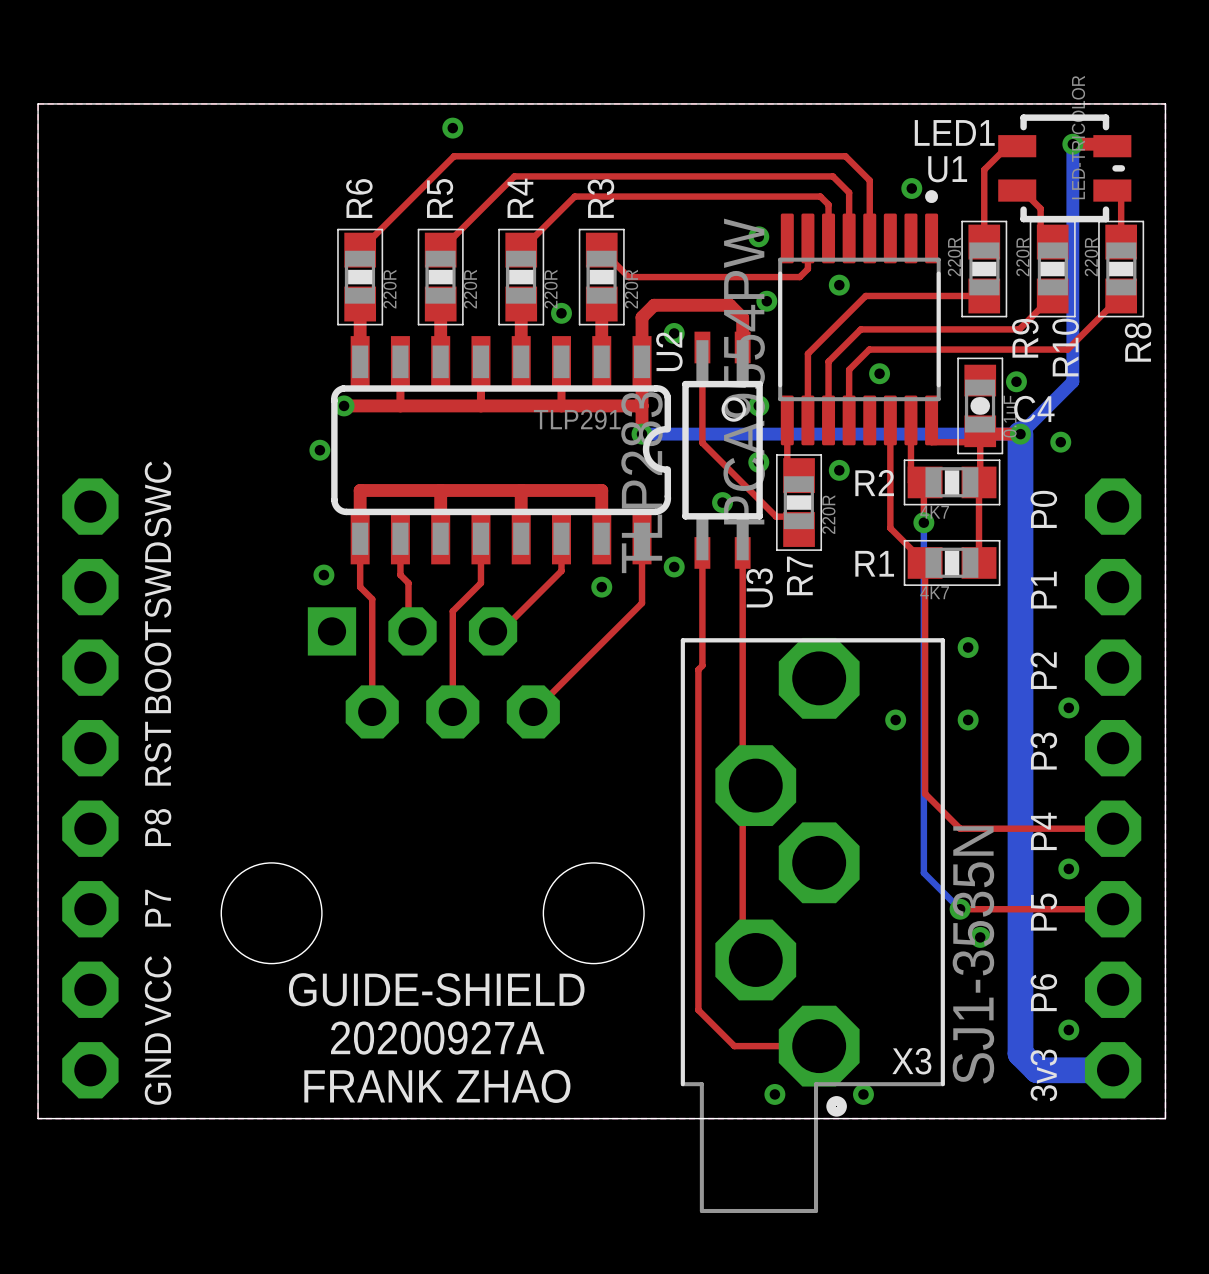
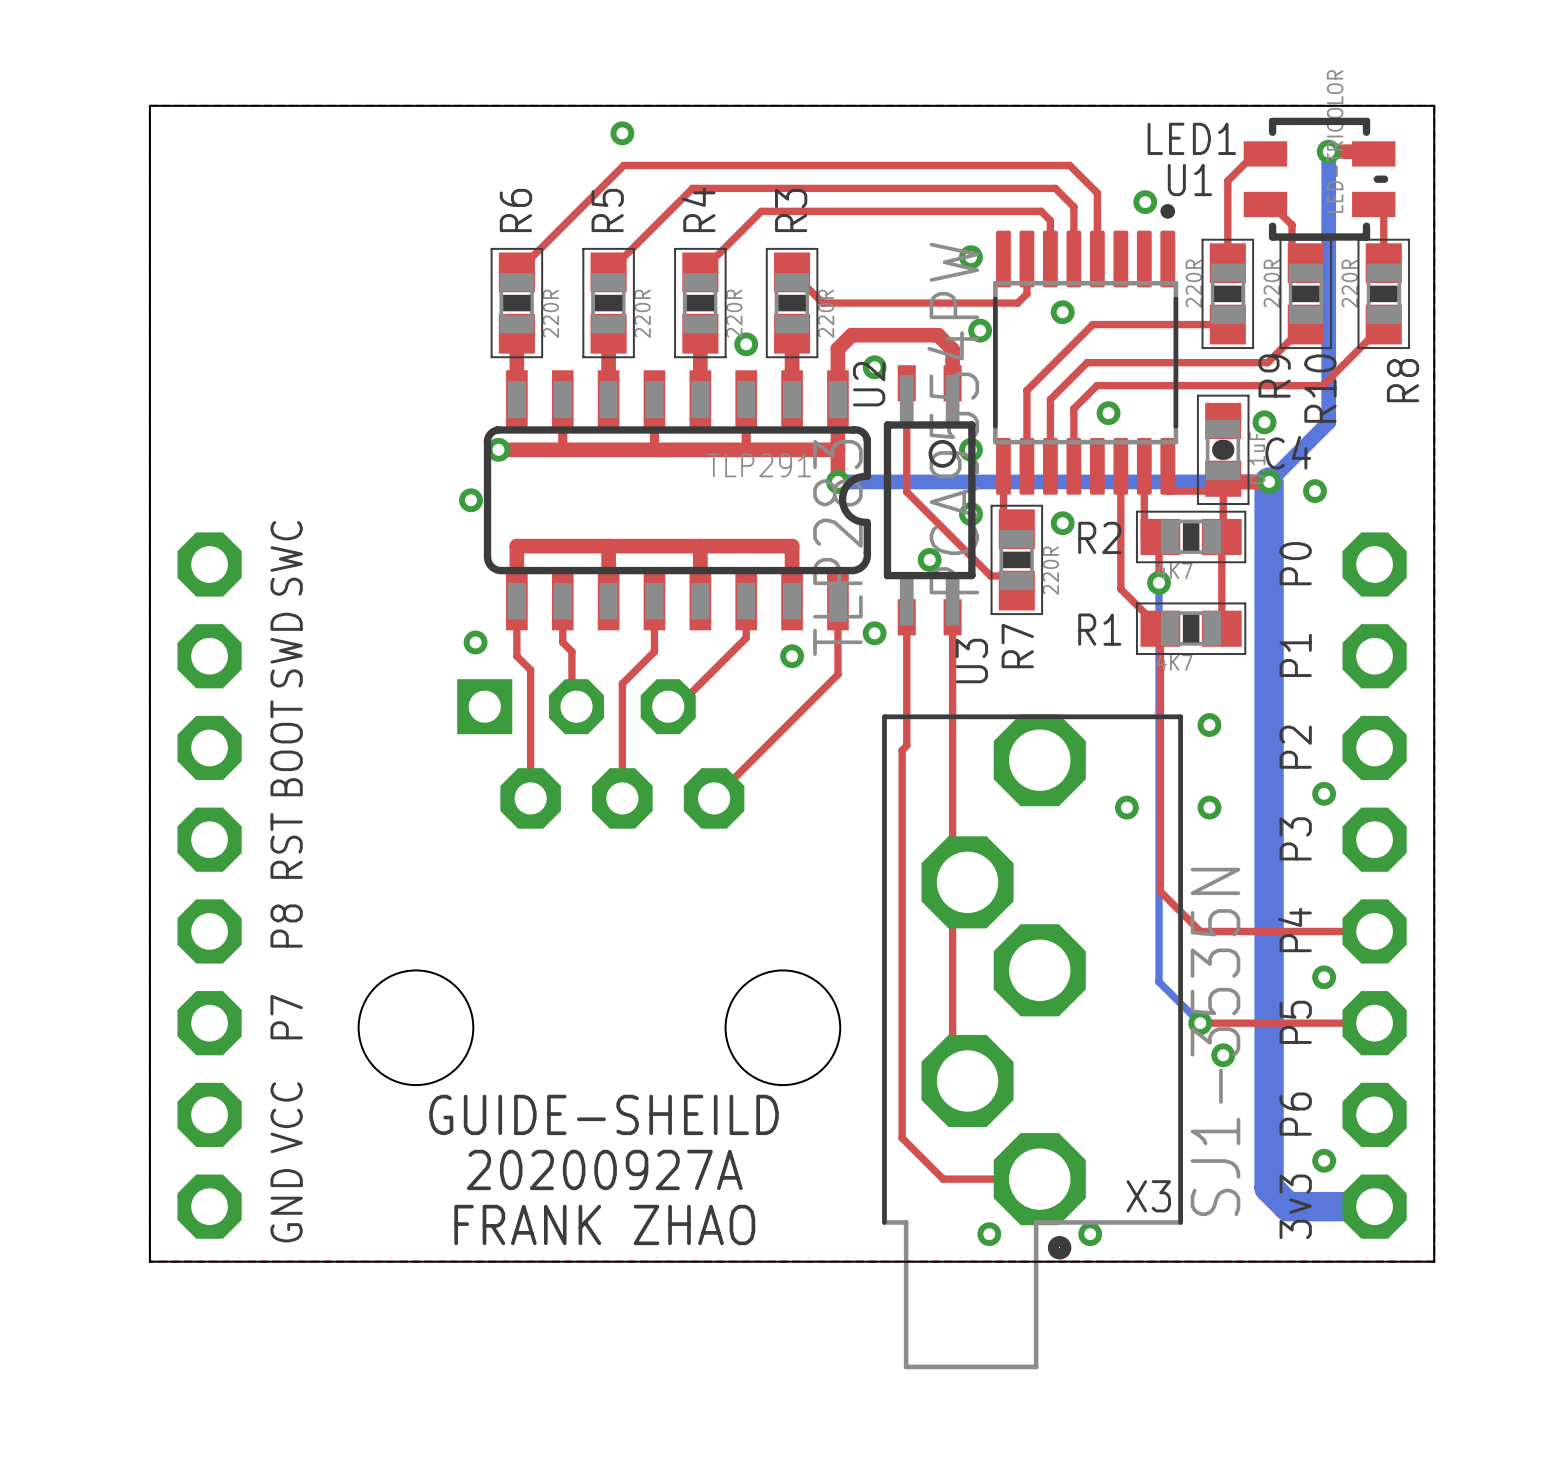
text: GUIDE-SHIELD (436, 989) -> GUIDE-SHEILD (604, 1114)

